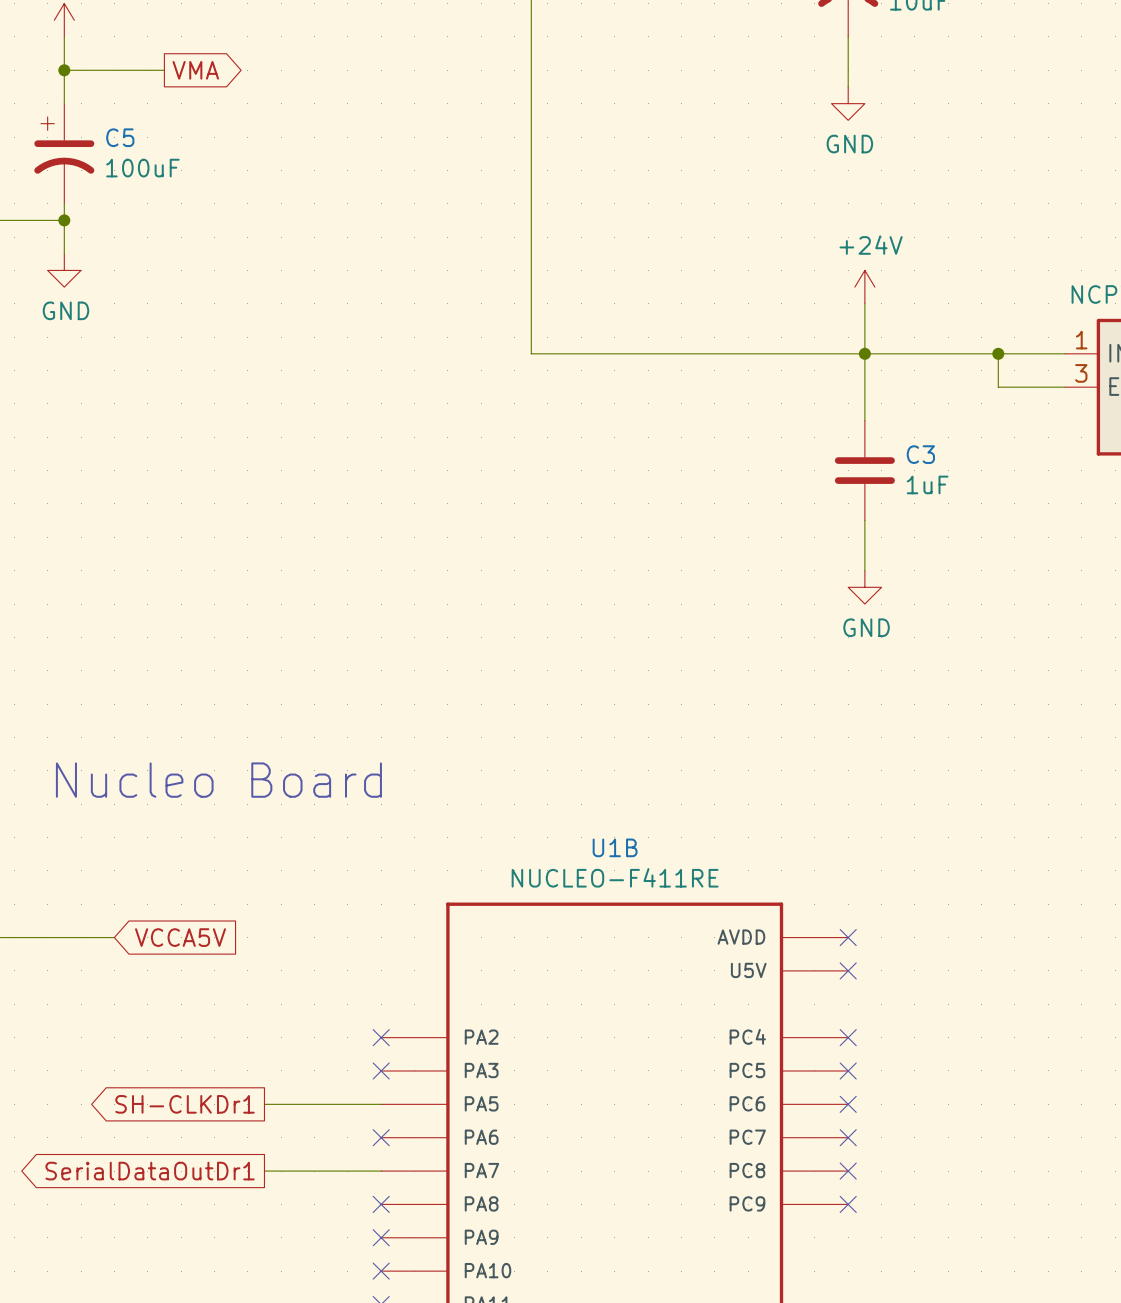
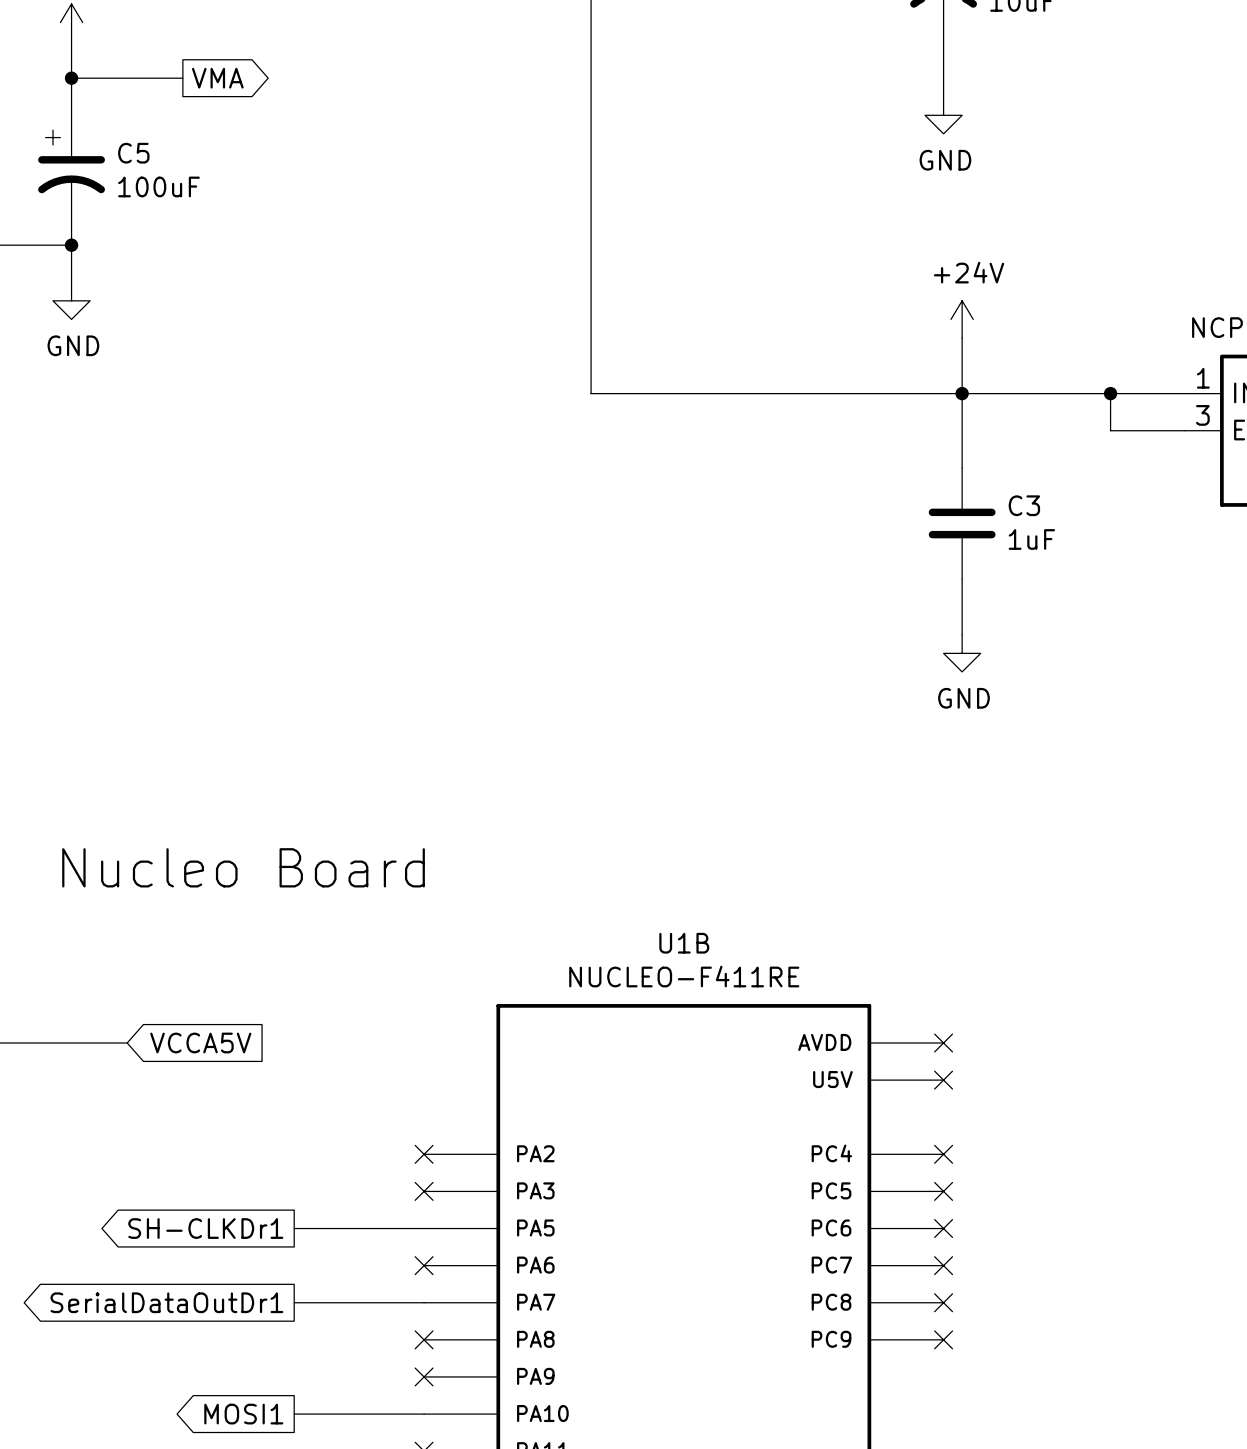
global label: none -> MOSI1 (243, 1414)
wire: none -> (294, 1414) (424, 1414)
no-connect mark: (381, 1271) -> none

